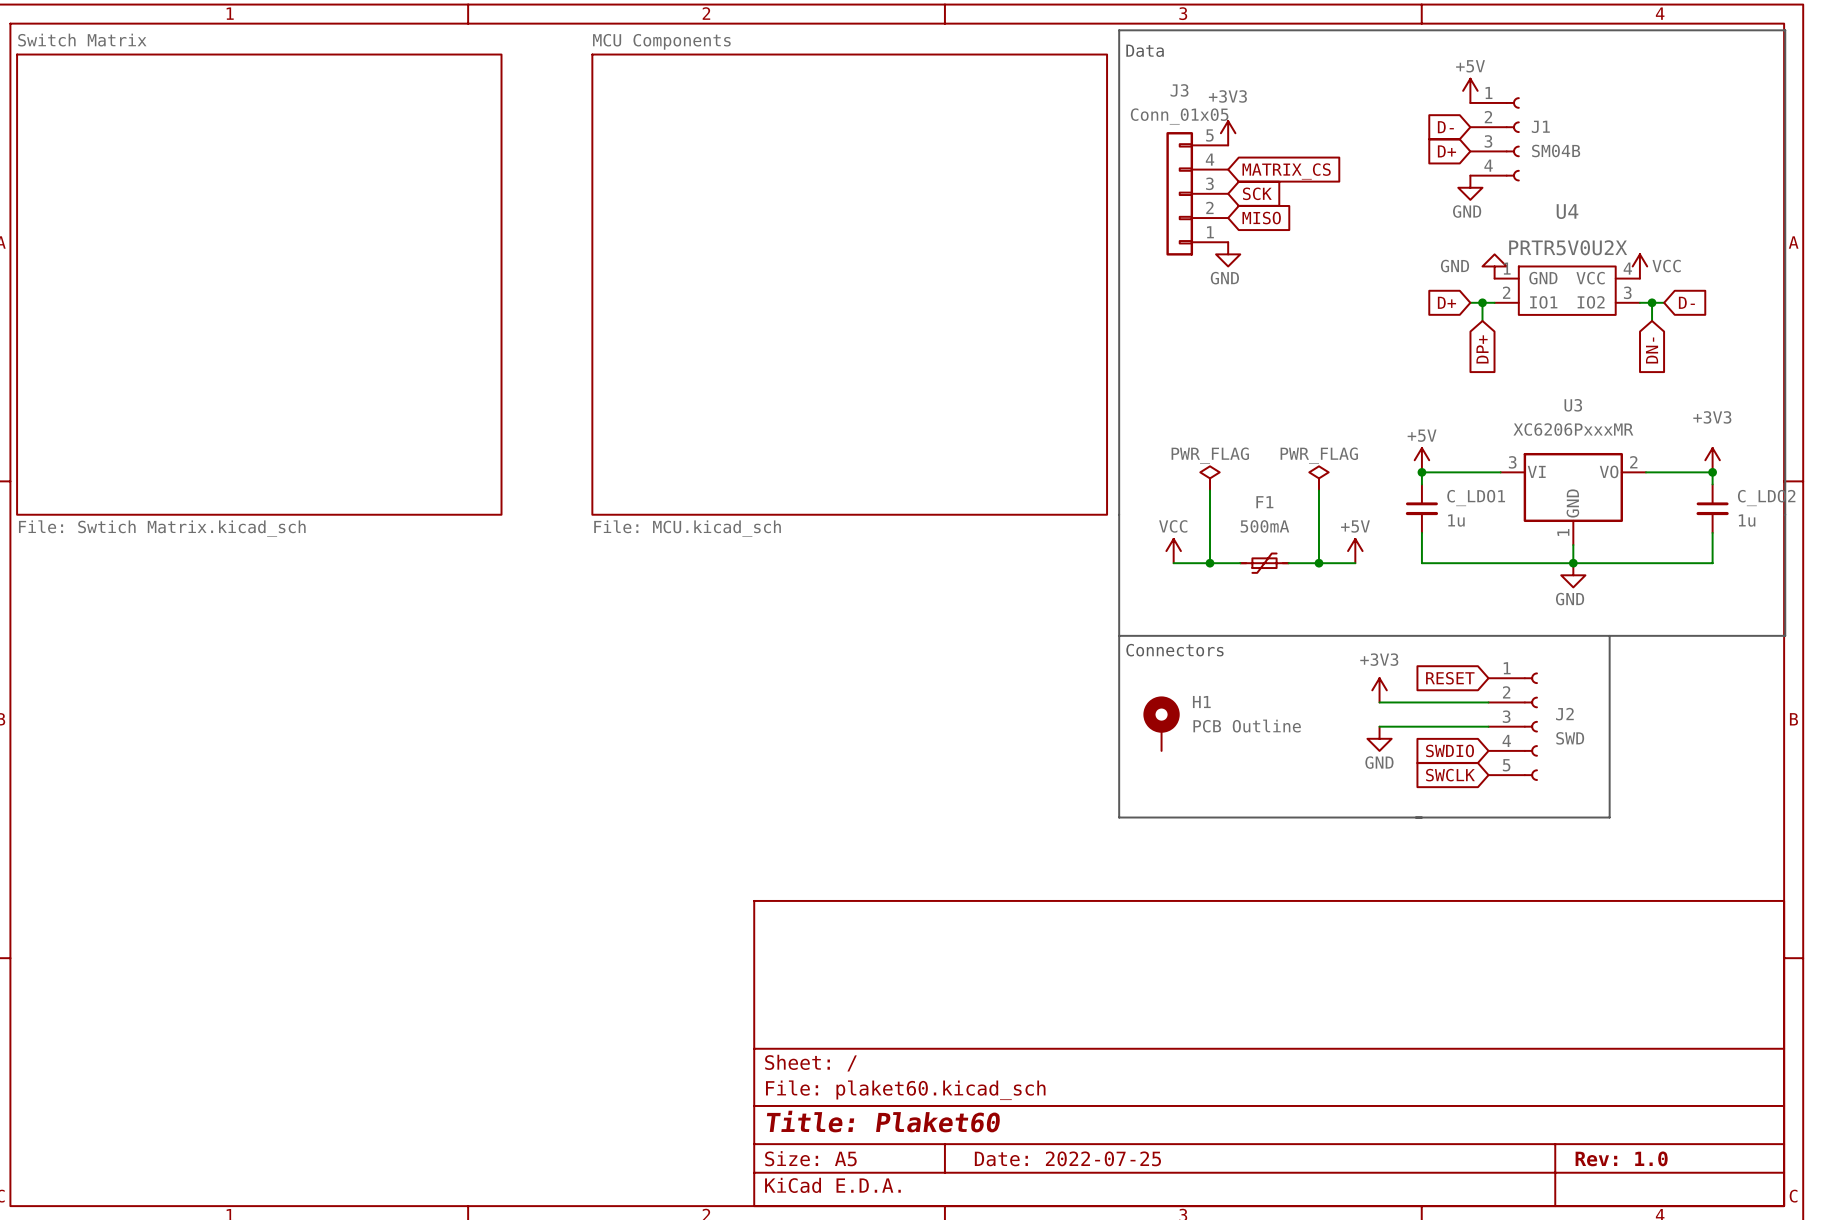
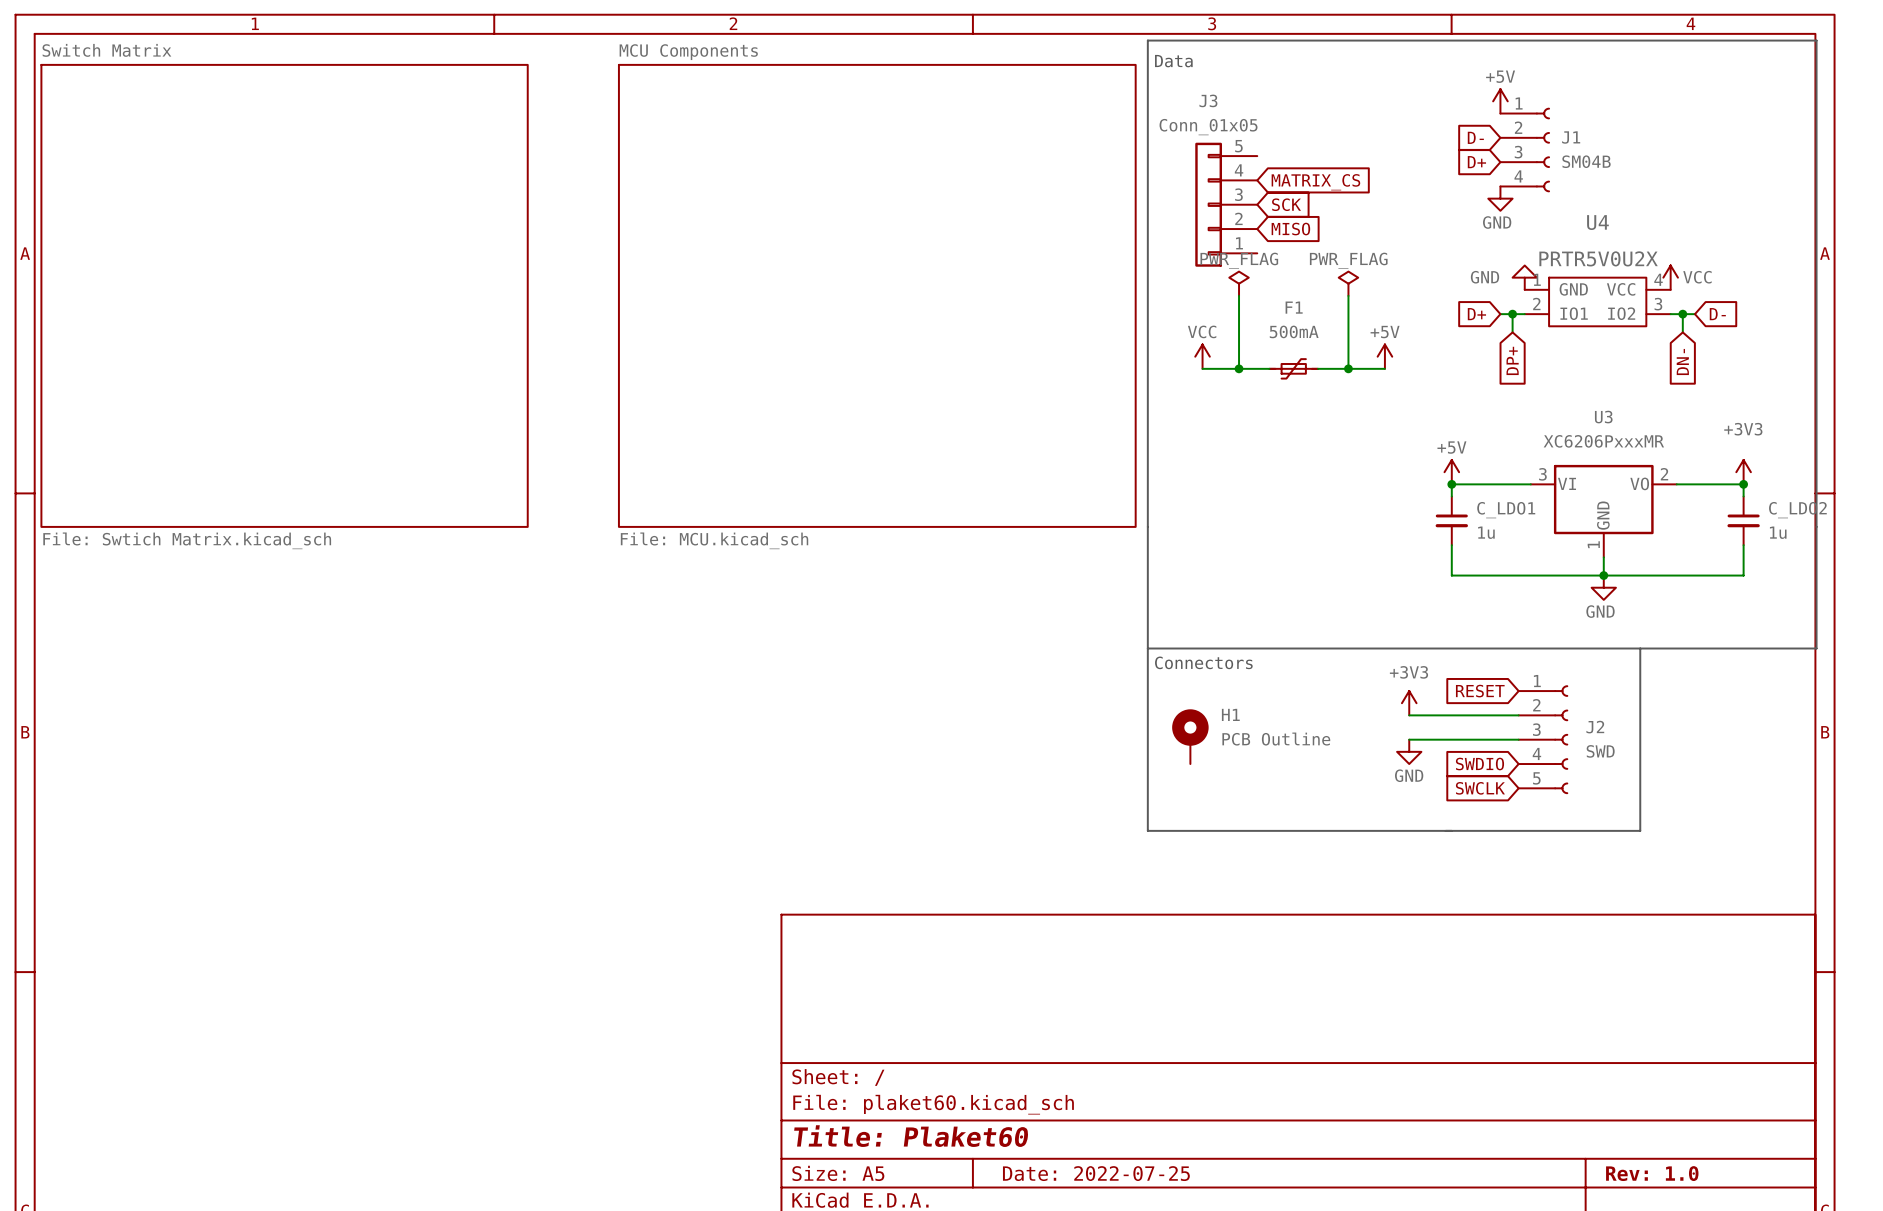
power symbol: +3V3 (1228, 133) -> none
power symbol: GND (1228, 254) -> none
power symbol: none -> PWR_FLAG (1239, 283)
power symbol: none -> PWR_FLAG (1348, 283)
junction: none -> (1239, 368)
junction: none -> (1348, 368)
power symbol: PWR_FLAG (1210, 478) -> none
power symbol: PWR_FLAG (1318, 478) -> none
wire: (1210, 490) (1210, 563) -> (1239, 295) (1239, 368)
wire: (1318, 490) (1318, 563) -> (1348, 295) (1348, 368)
power symbol position: VCC (1173, 551) -> VCC (1202, 356)
power symbol position: +5V (1355, 551) -> +5V (1384, 356)
wire: (1173, 563) (1240, 563) -> (1202, 368) (1269, 368)
junction: (1210, 563) -> none
F1 position: (1264, 563) -> (1293, 368)
wire: (1288, 563) (1355, 563) -> (1318, 368) (1384, 368)
junction: (1318, 563) -> none

